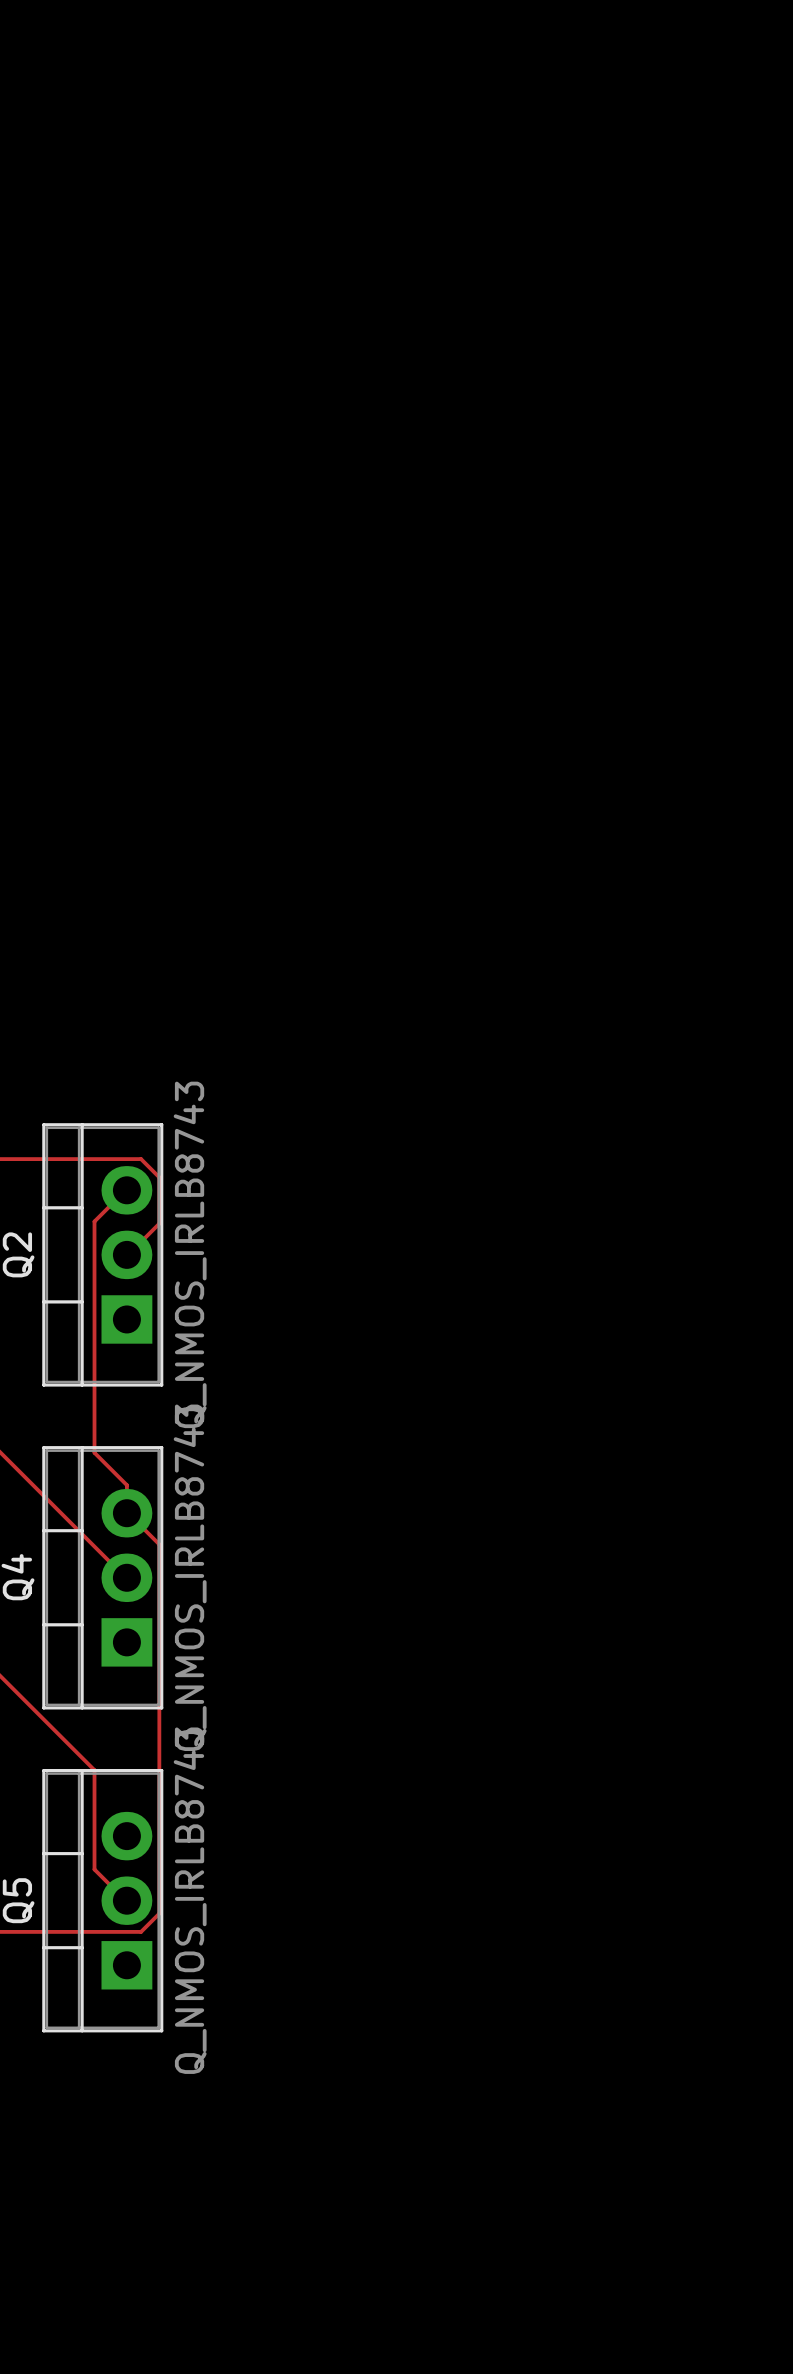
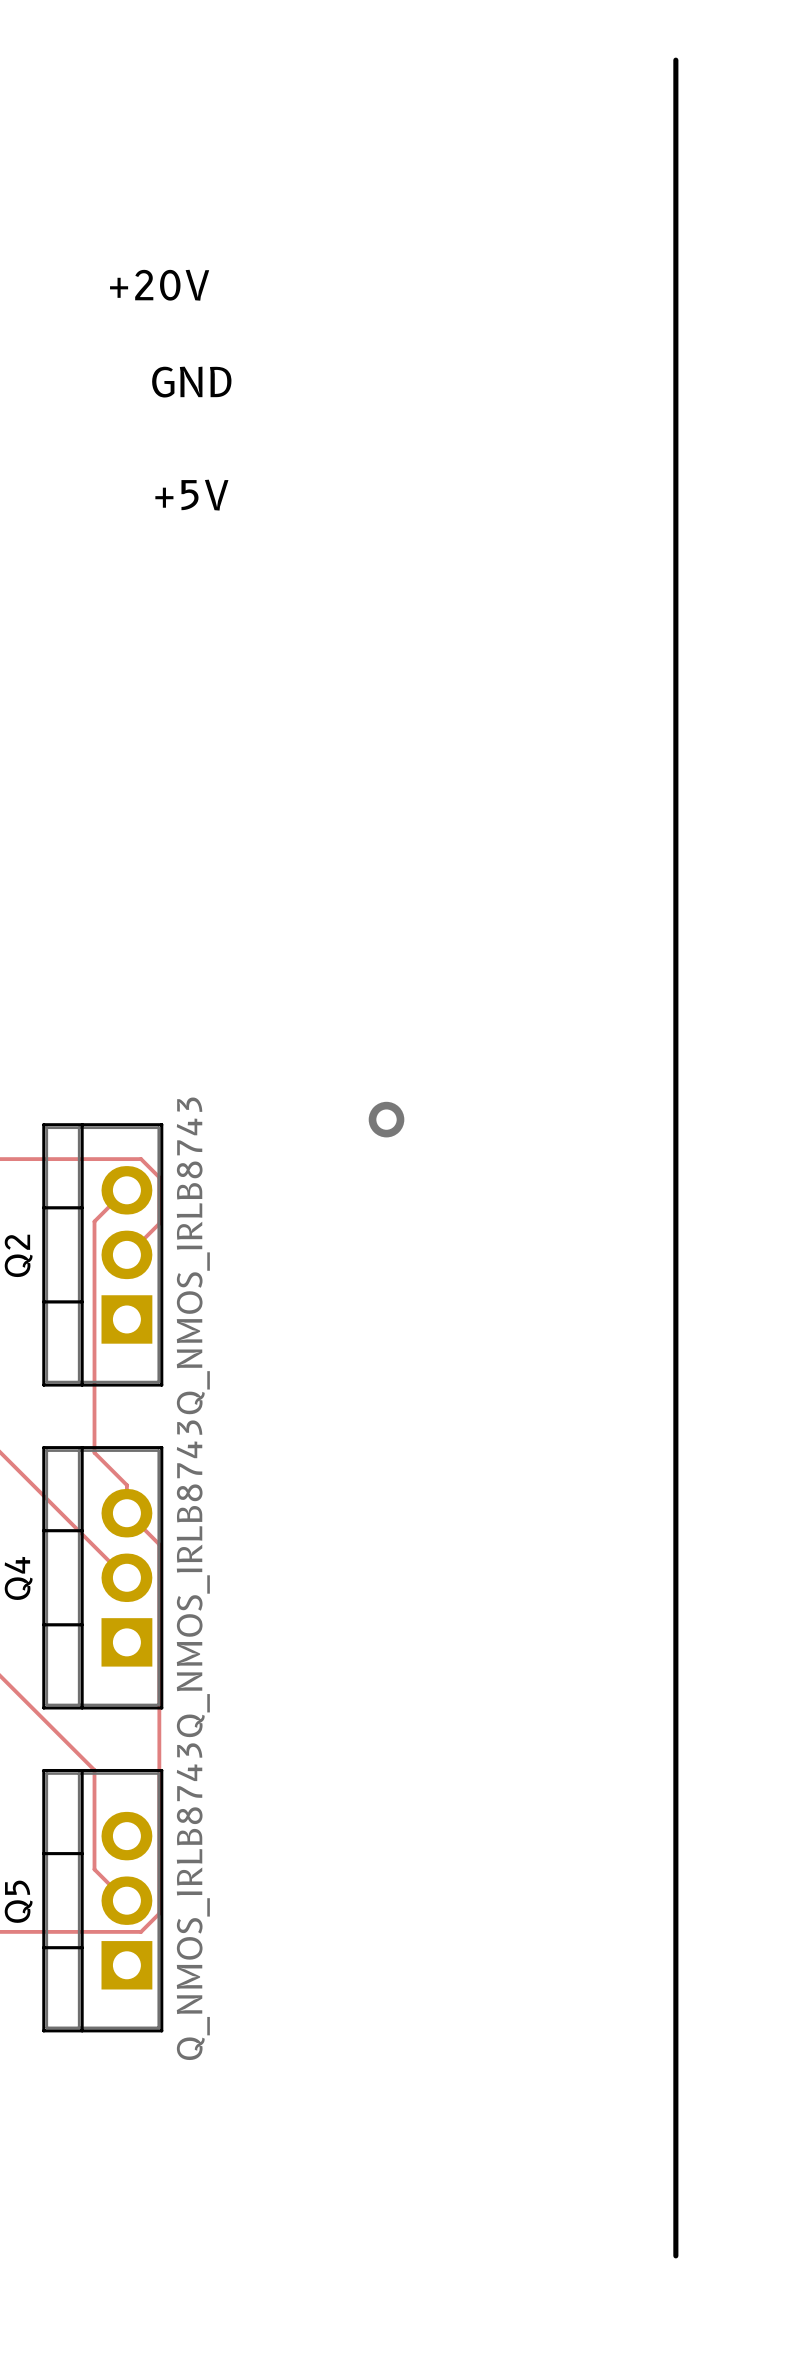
line: none -> (675, 60) (675, 2255)
text: none -> +20V (159, 285)
text: none -> GND (191, 382)
text: none -> +5V (191, 495)
via: none -> (386, 1119)

